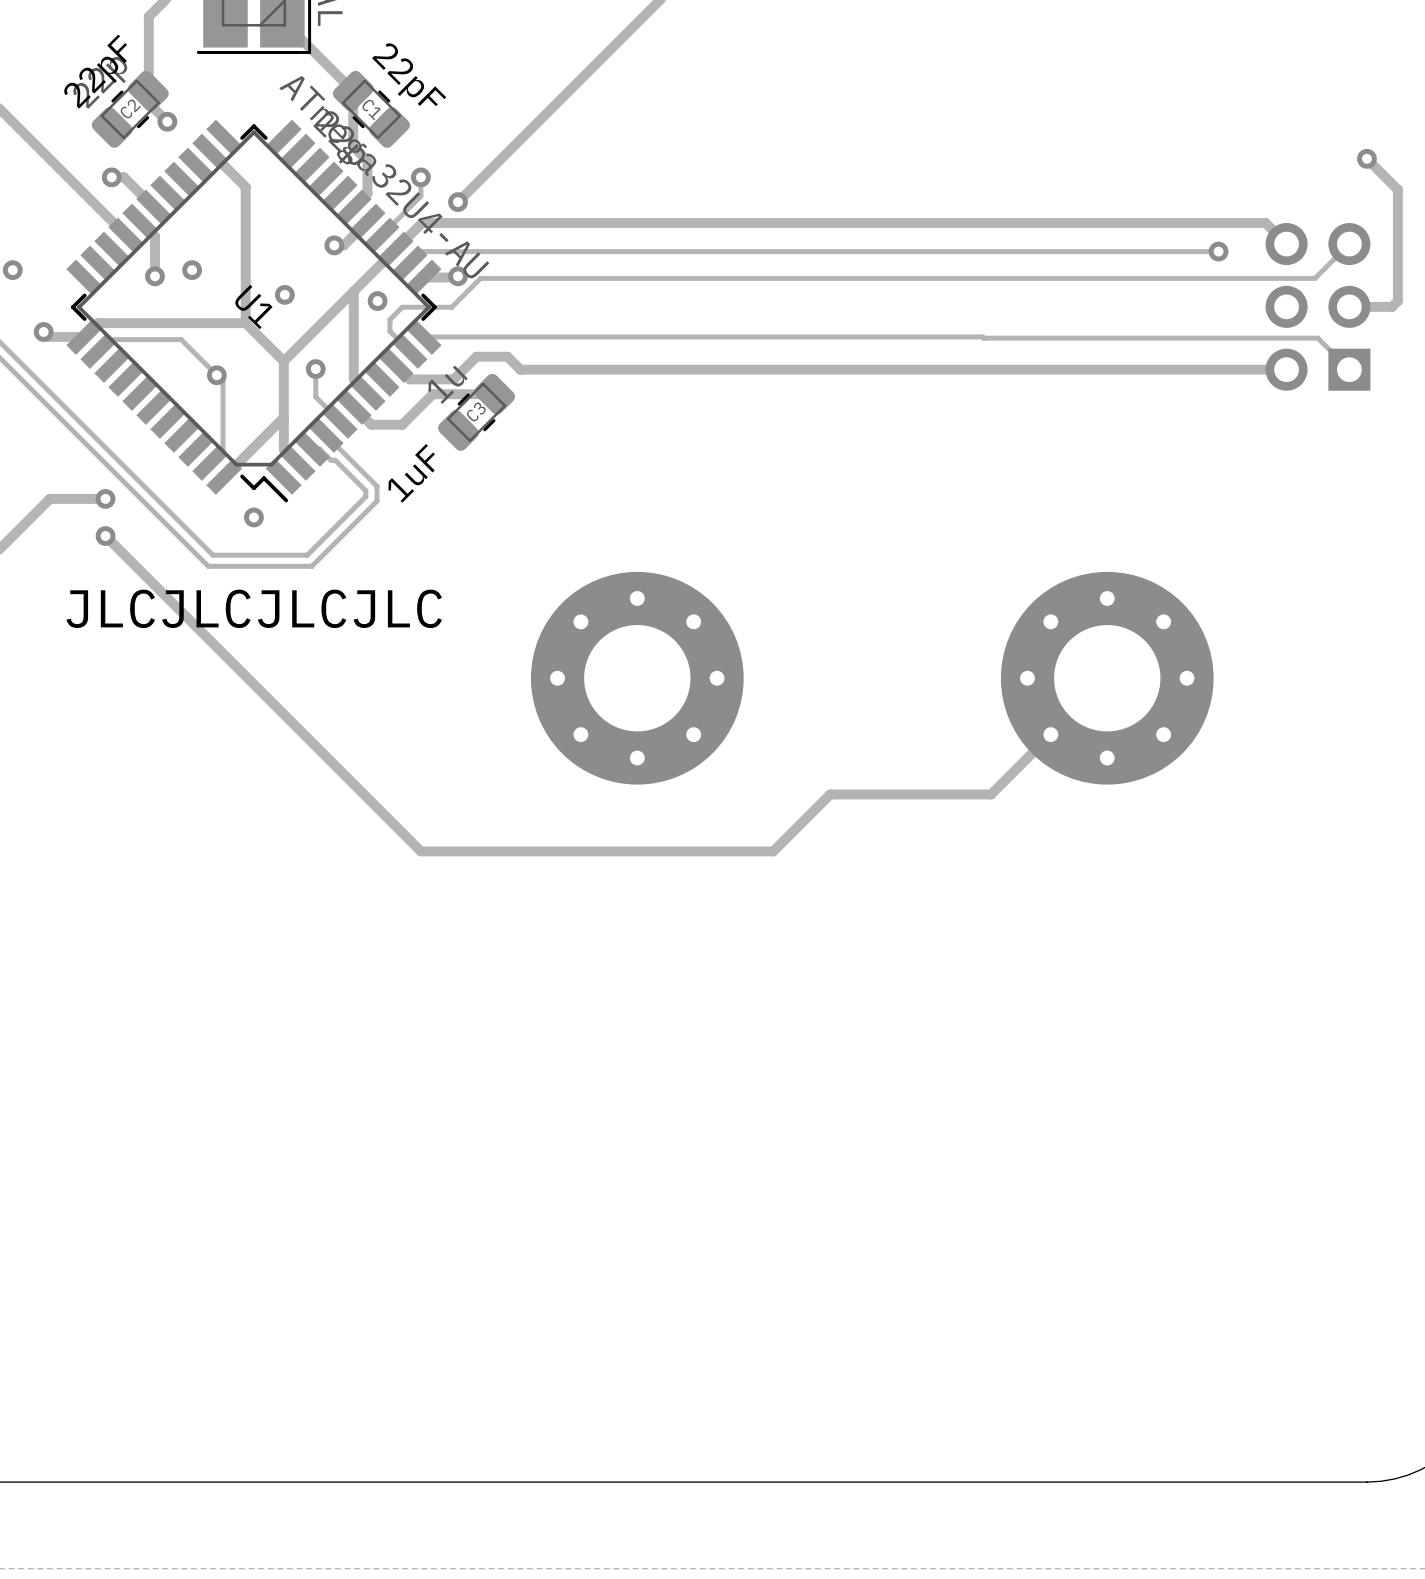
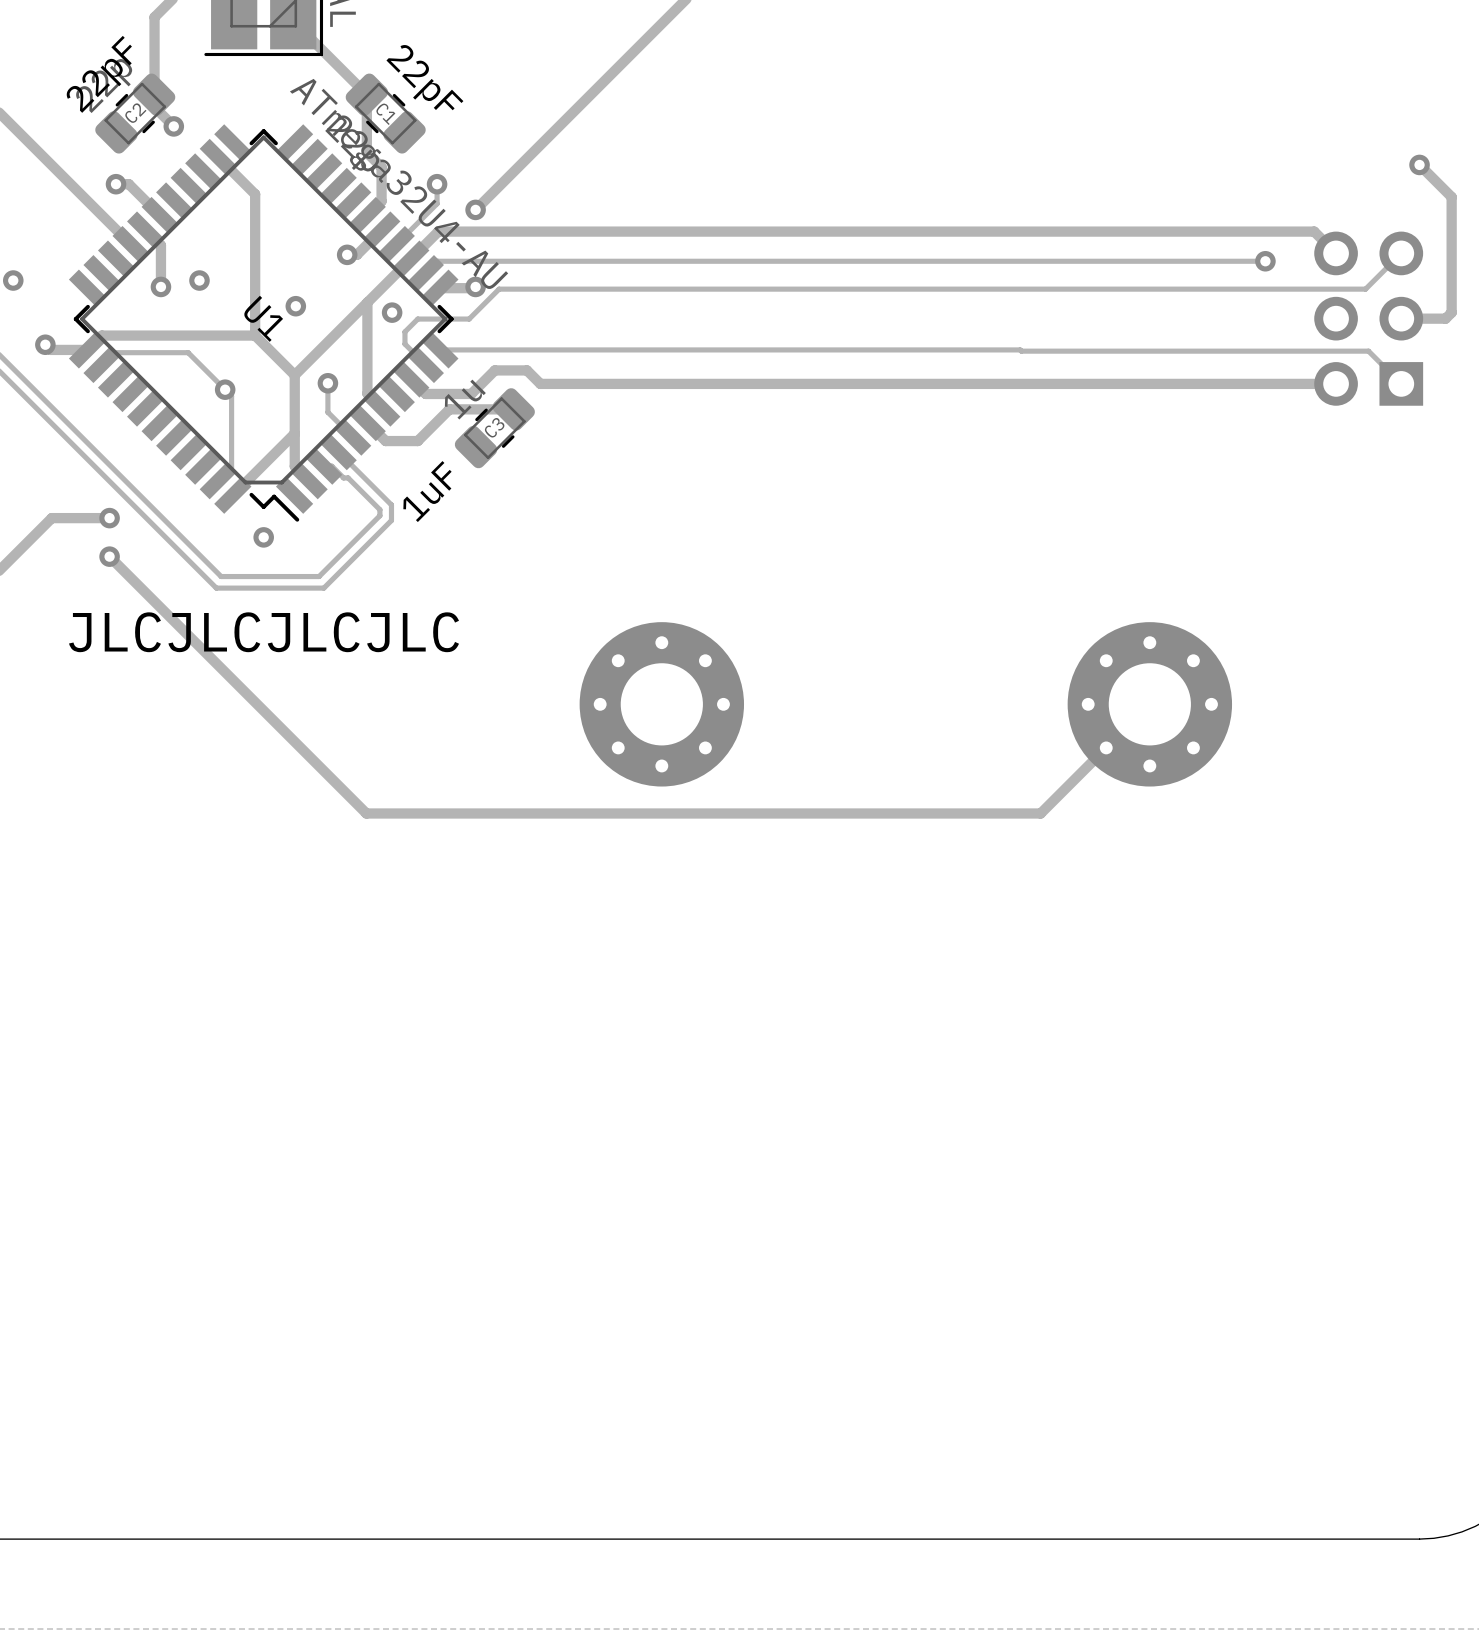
part footprint: [530, 571, 744, 785] -> [579, 622, 745, 787]
part footprint: [1000, 571, 1214, 785] -> [1067, 622, 1233, 787]
track: (1002, 783) (991, 794) (830, 794) (773, 851) (420, 851) (352, 783) -> (1040, 813) (366, 813)

